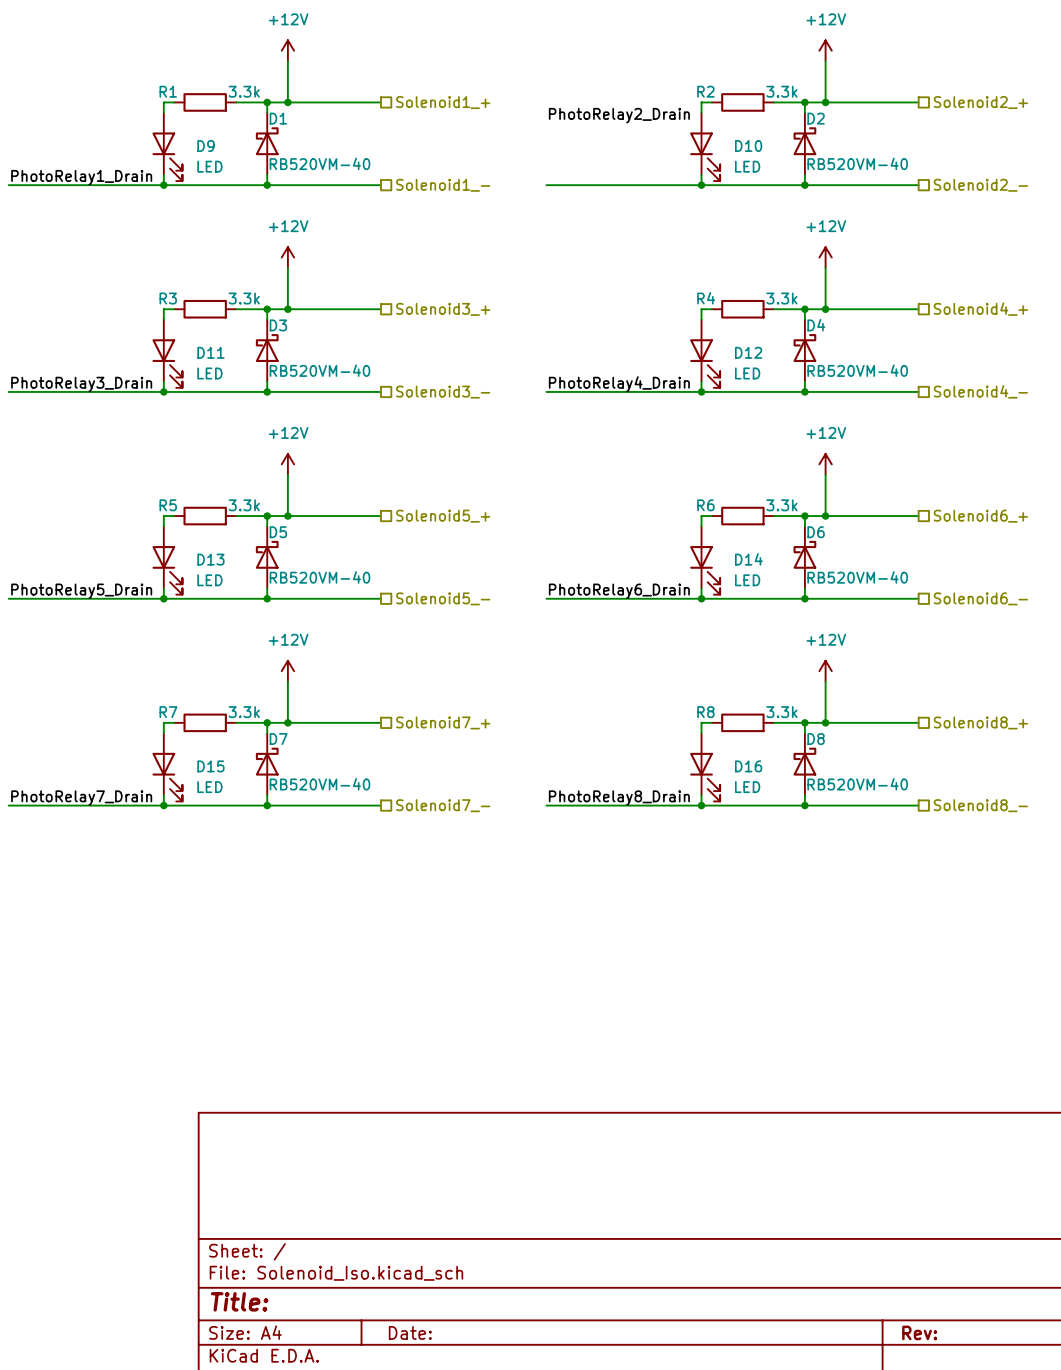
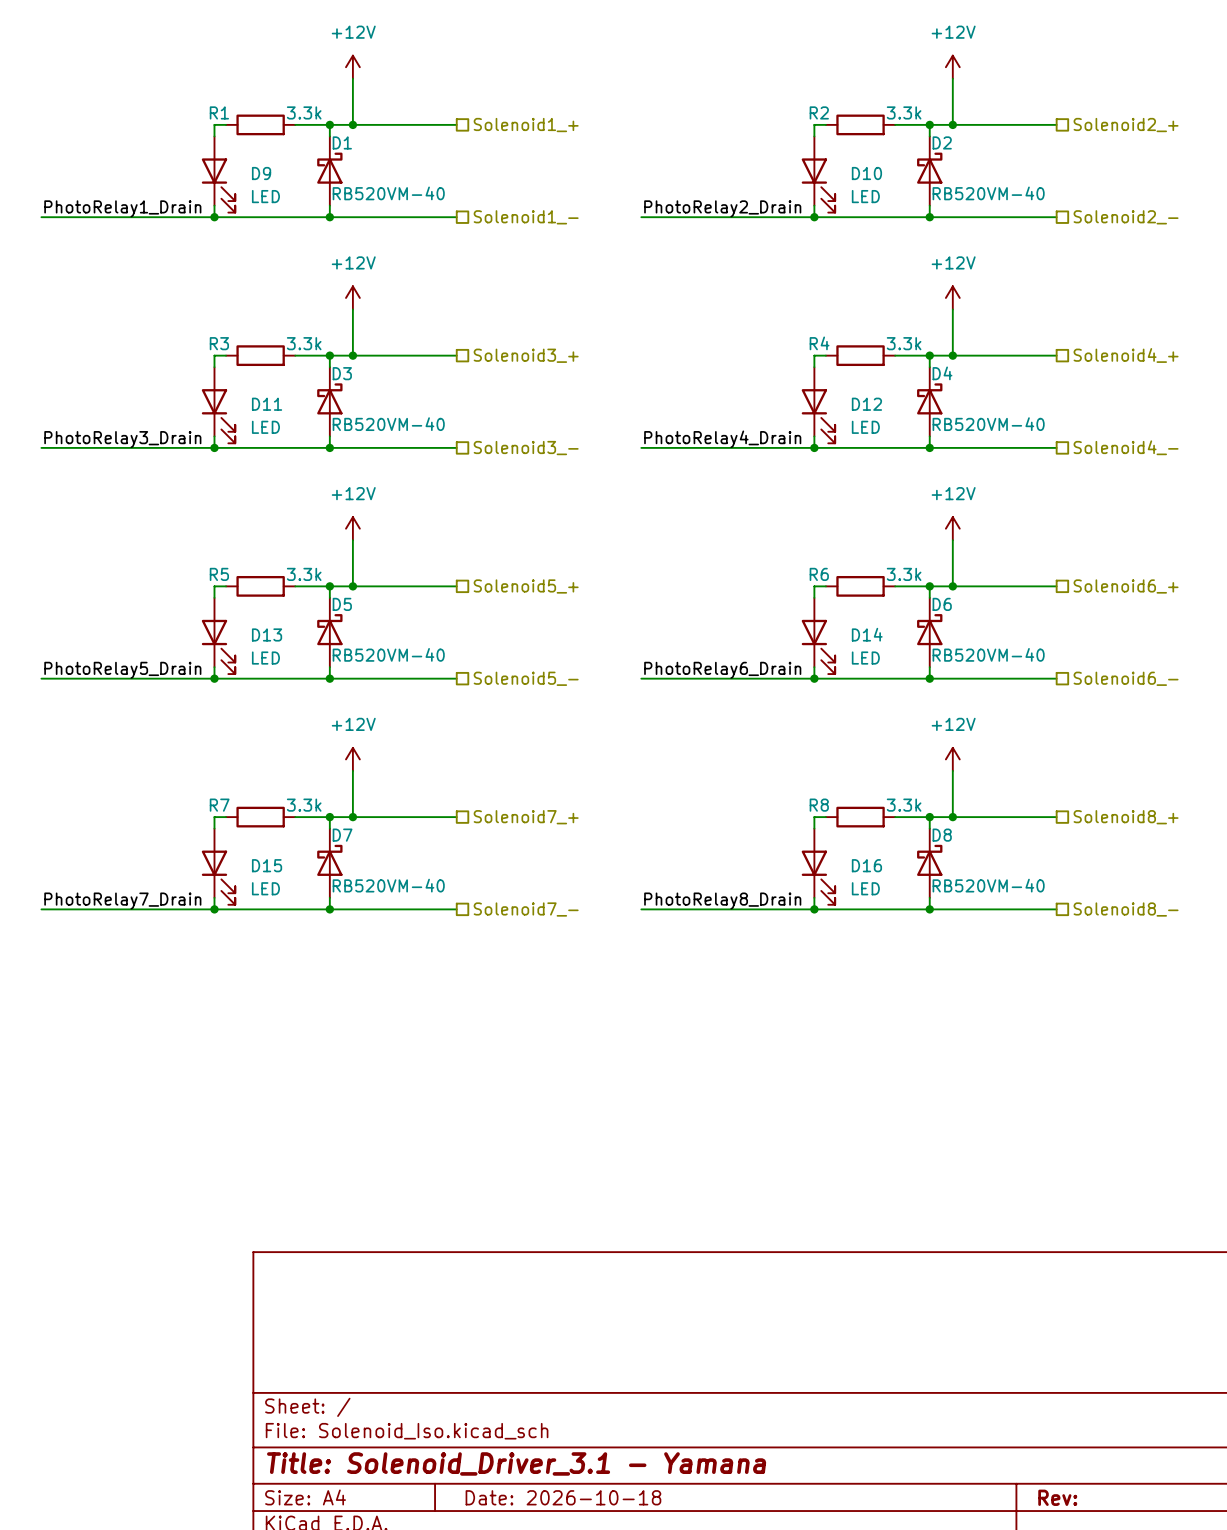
label position: PhotoRelay2_Drain (619, 115) -> PhotoRelay2_Drain (722, 208)
title block: Title: (239, 1301) -> Title: Solenoid_Driver_3.1 - Yamana (516, 1463)
title block: Date: (410, 1332) -> Date: 2026-10-18 (563, 1497)

